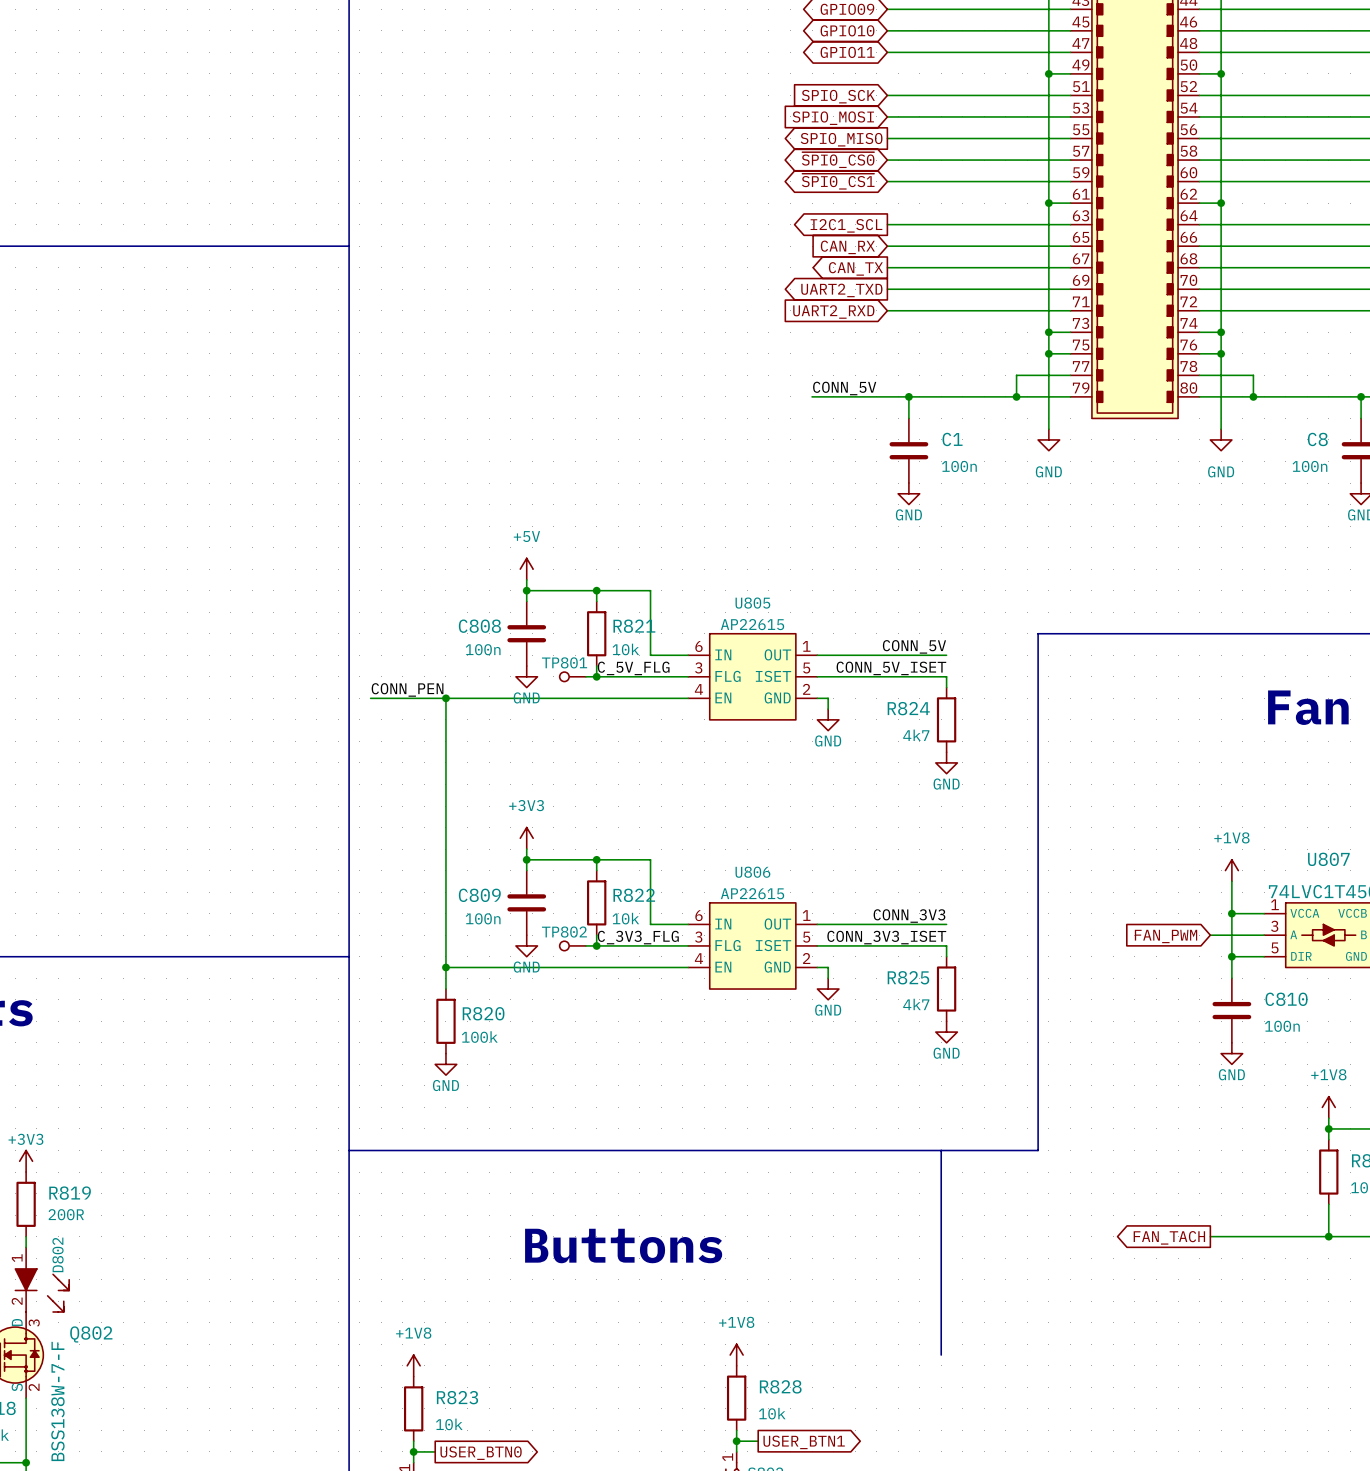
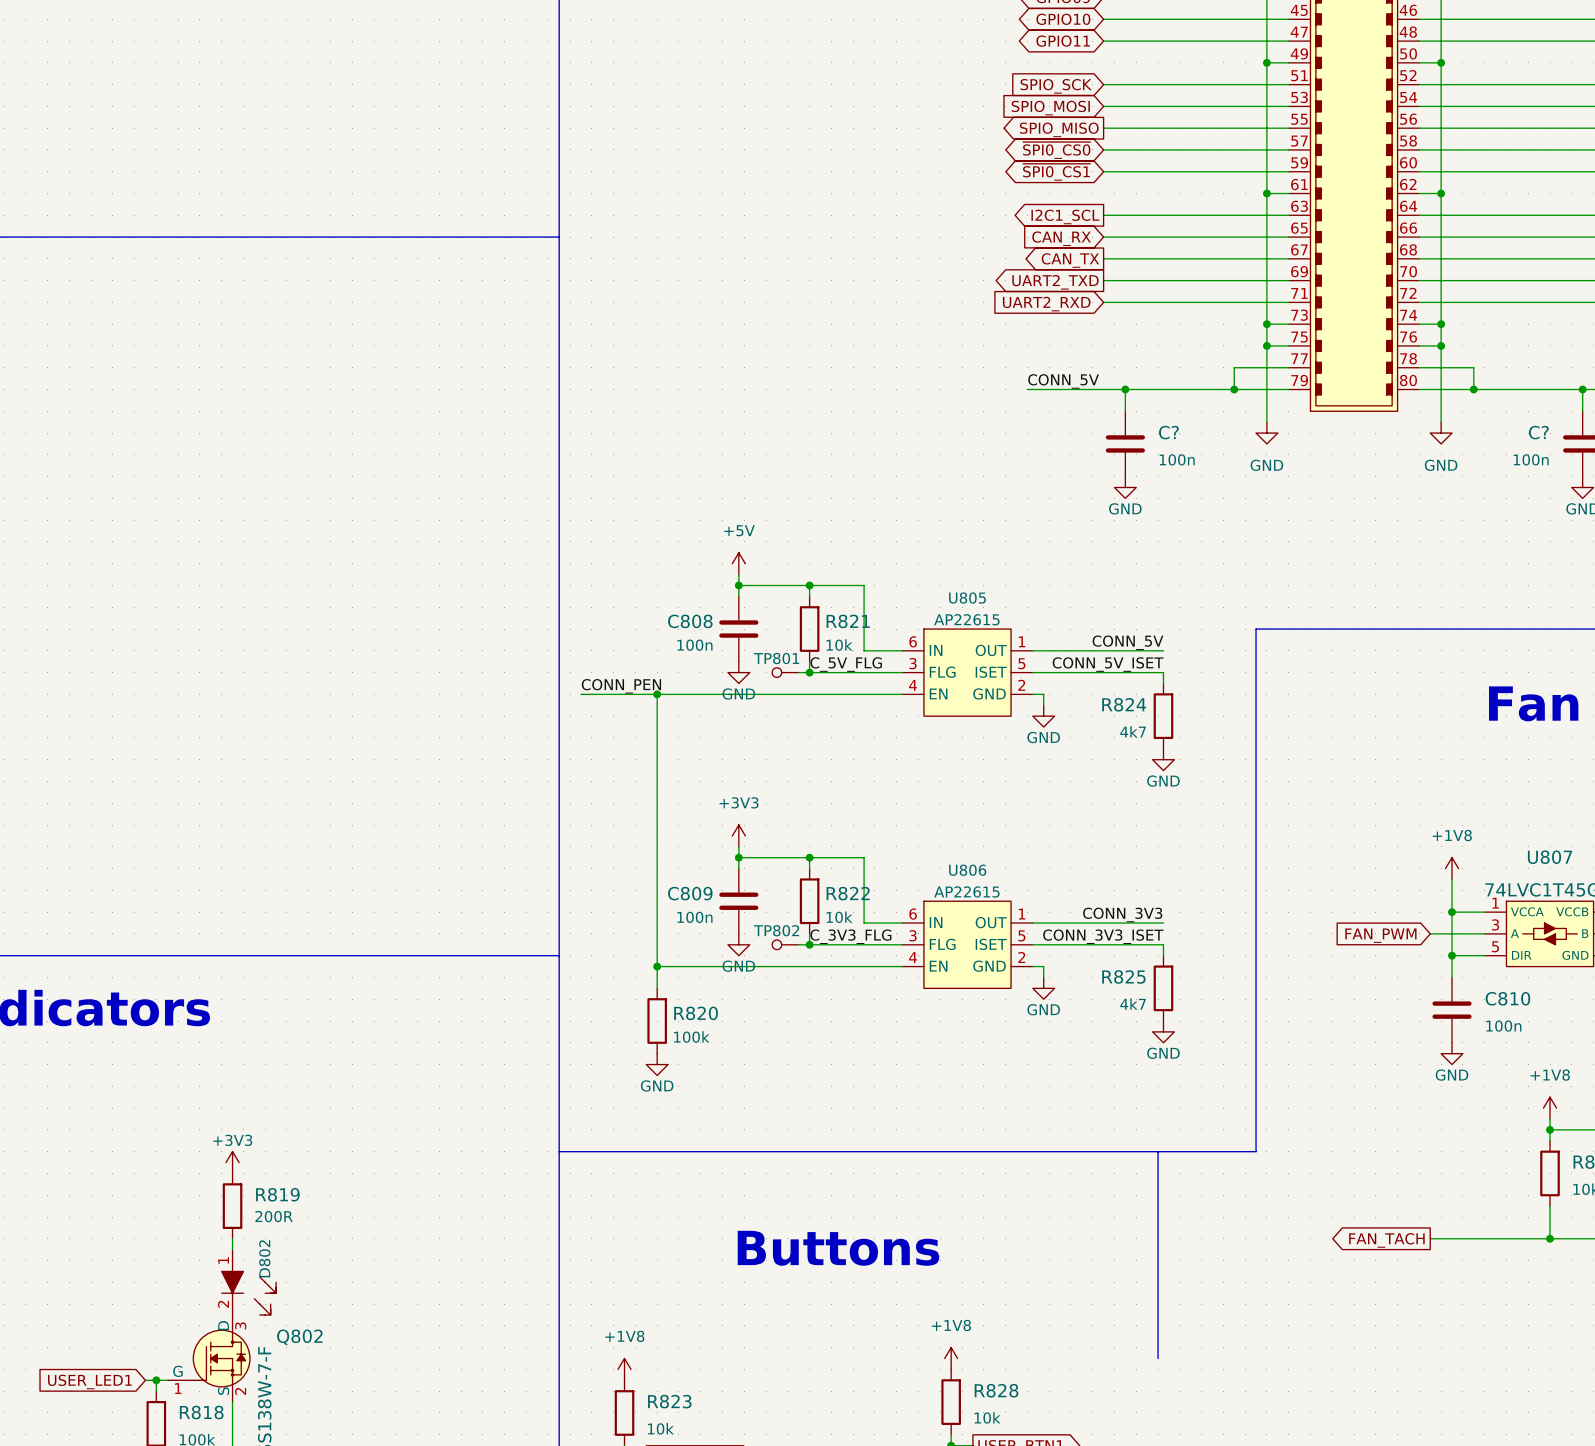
C1 name: C1 (952, 439) -> C? (1168, 432)
C8 name: C8 (1317, 439) -> C? (1538, 432)

